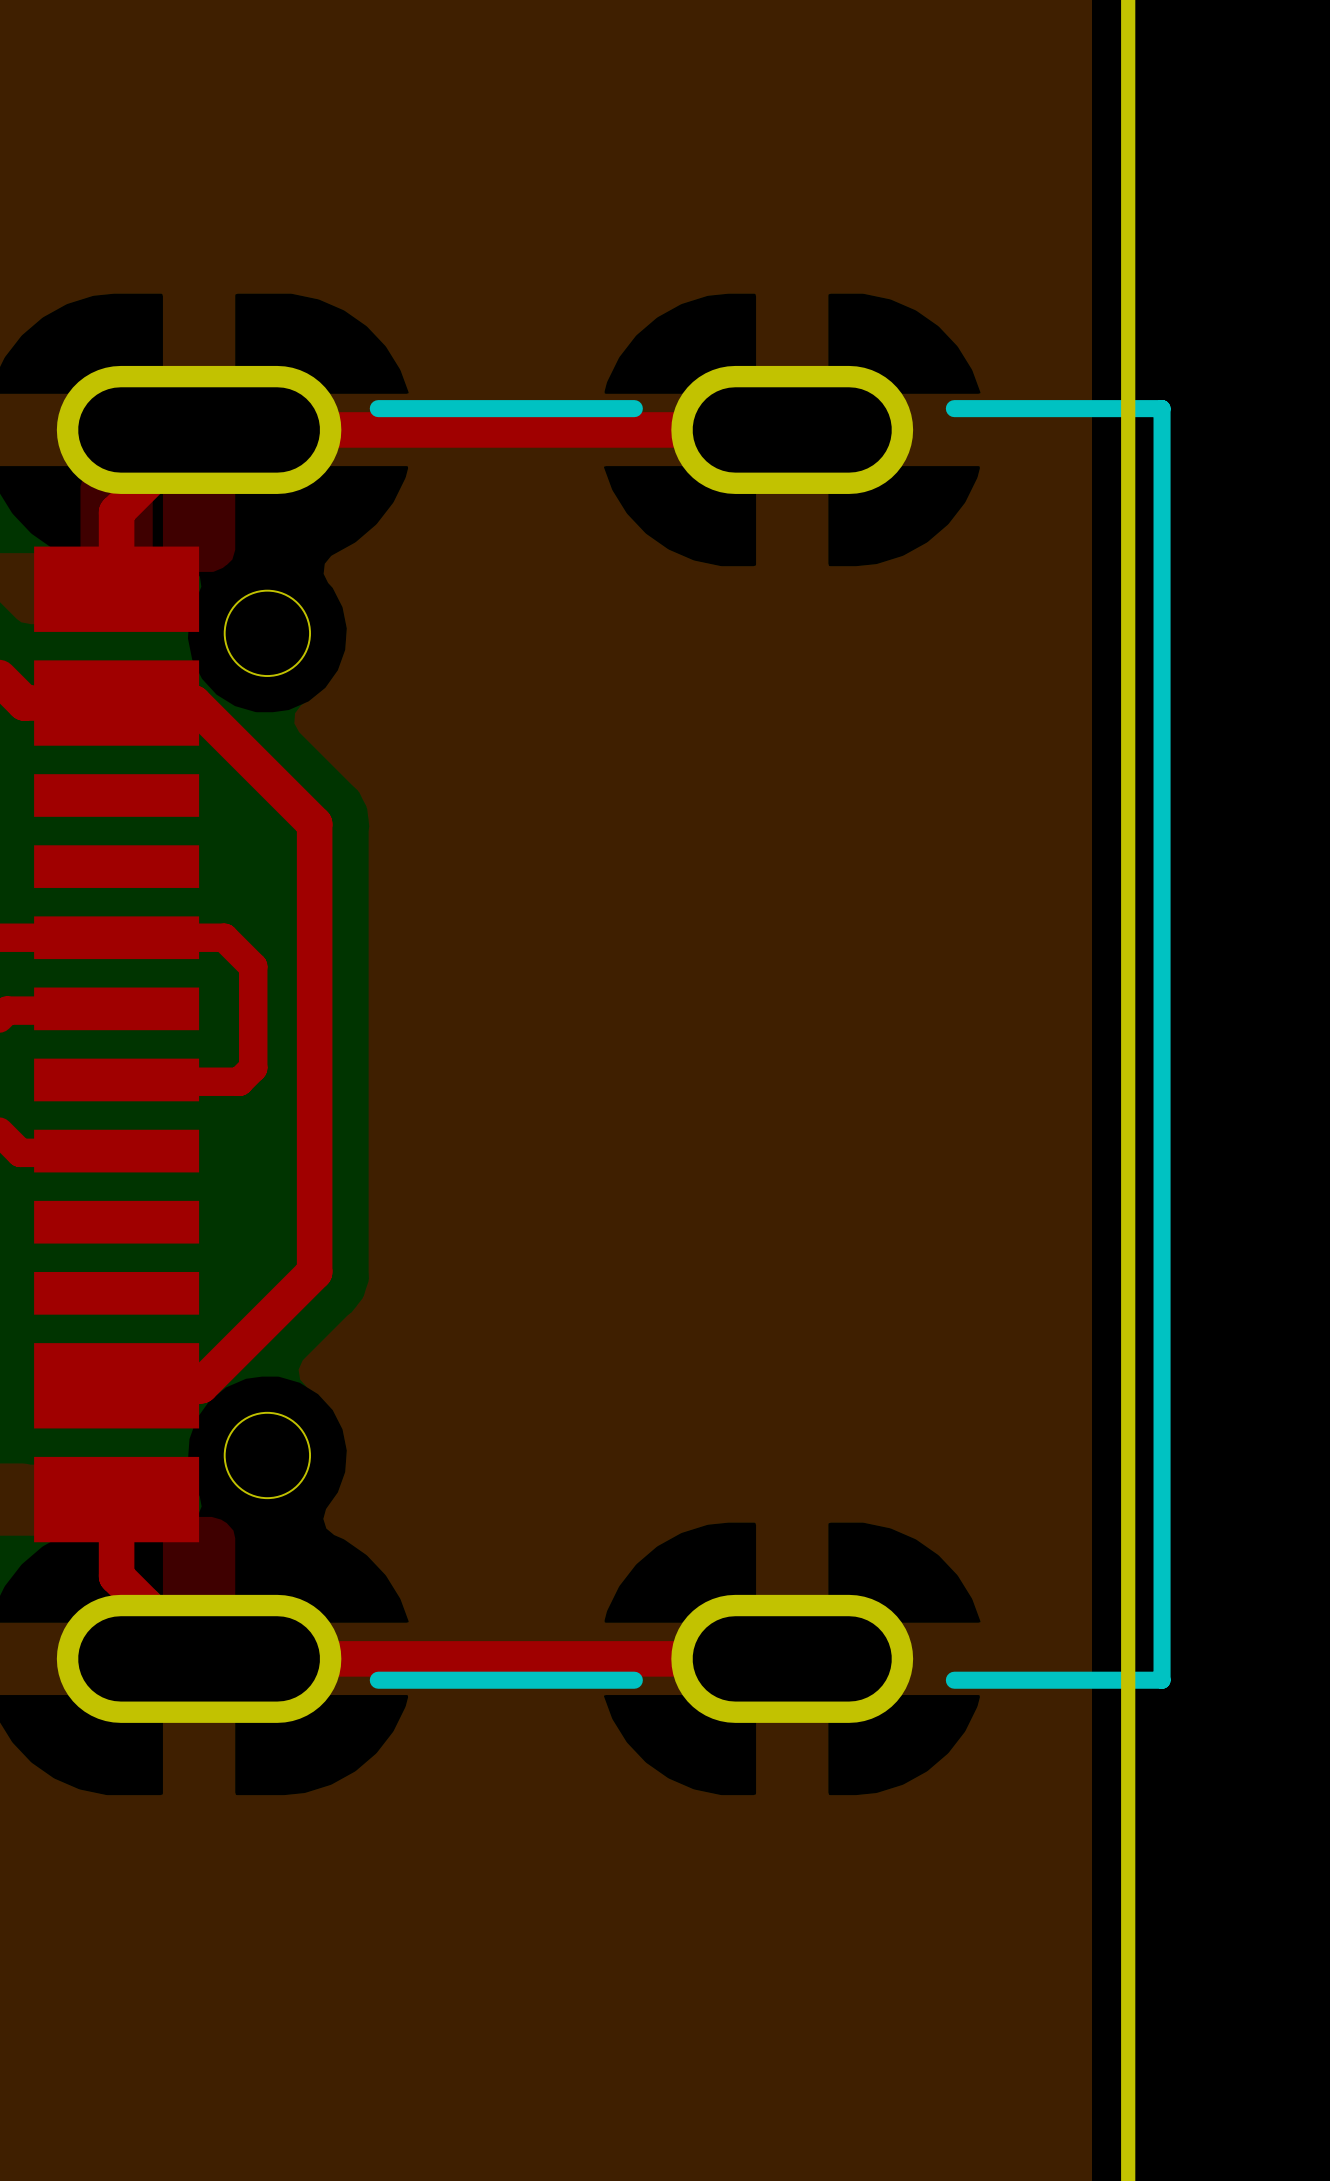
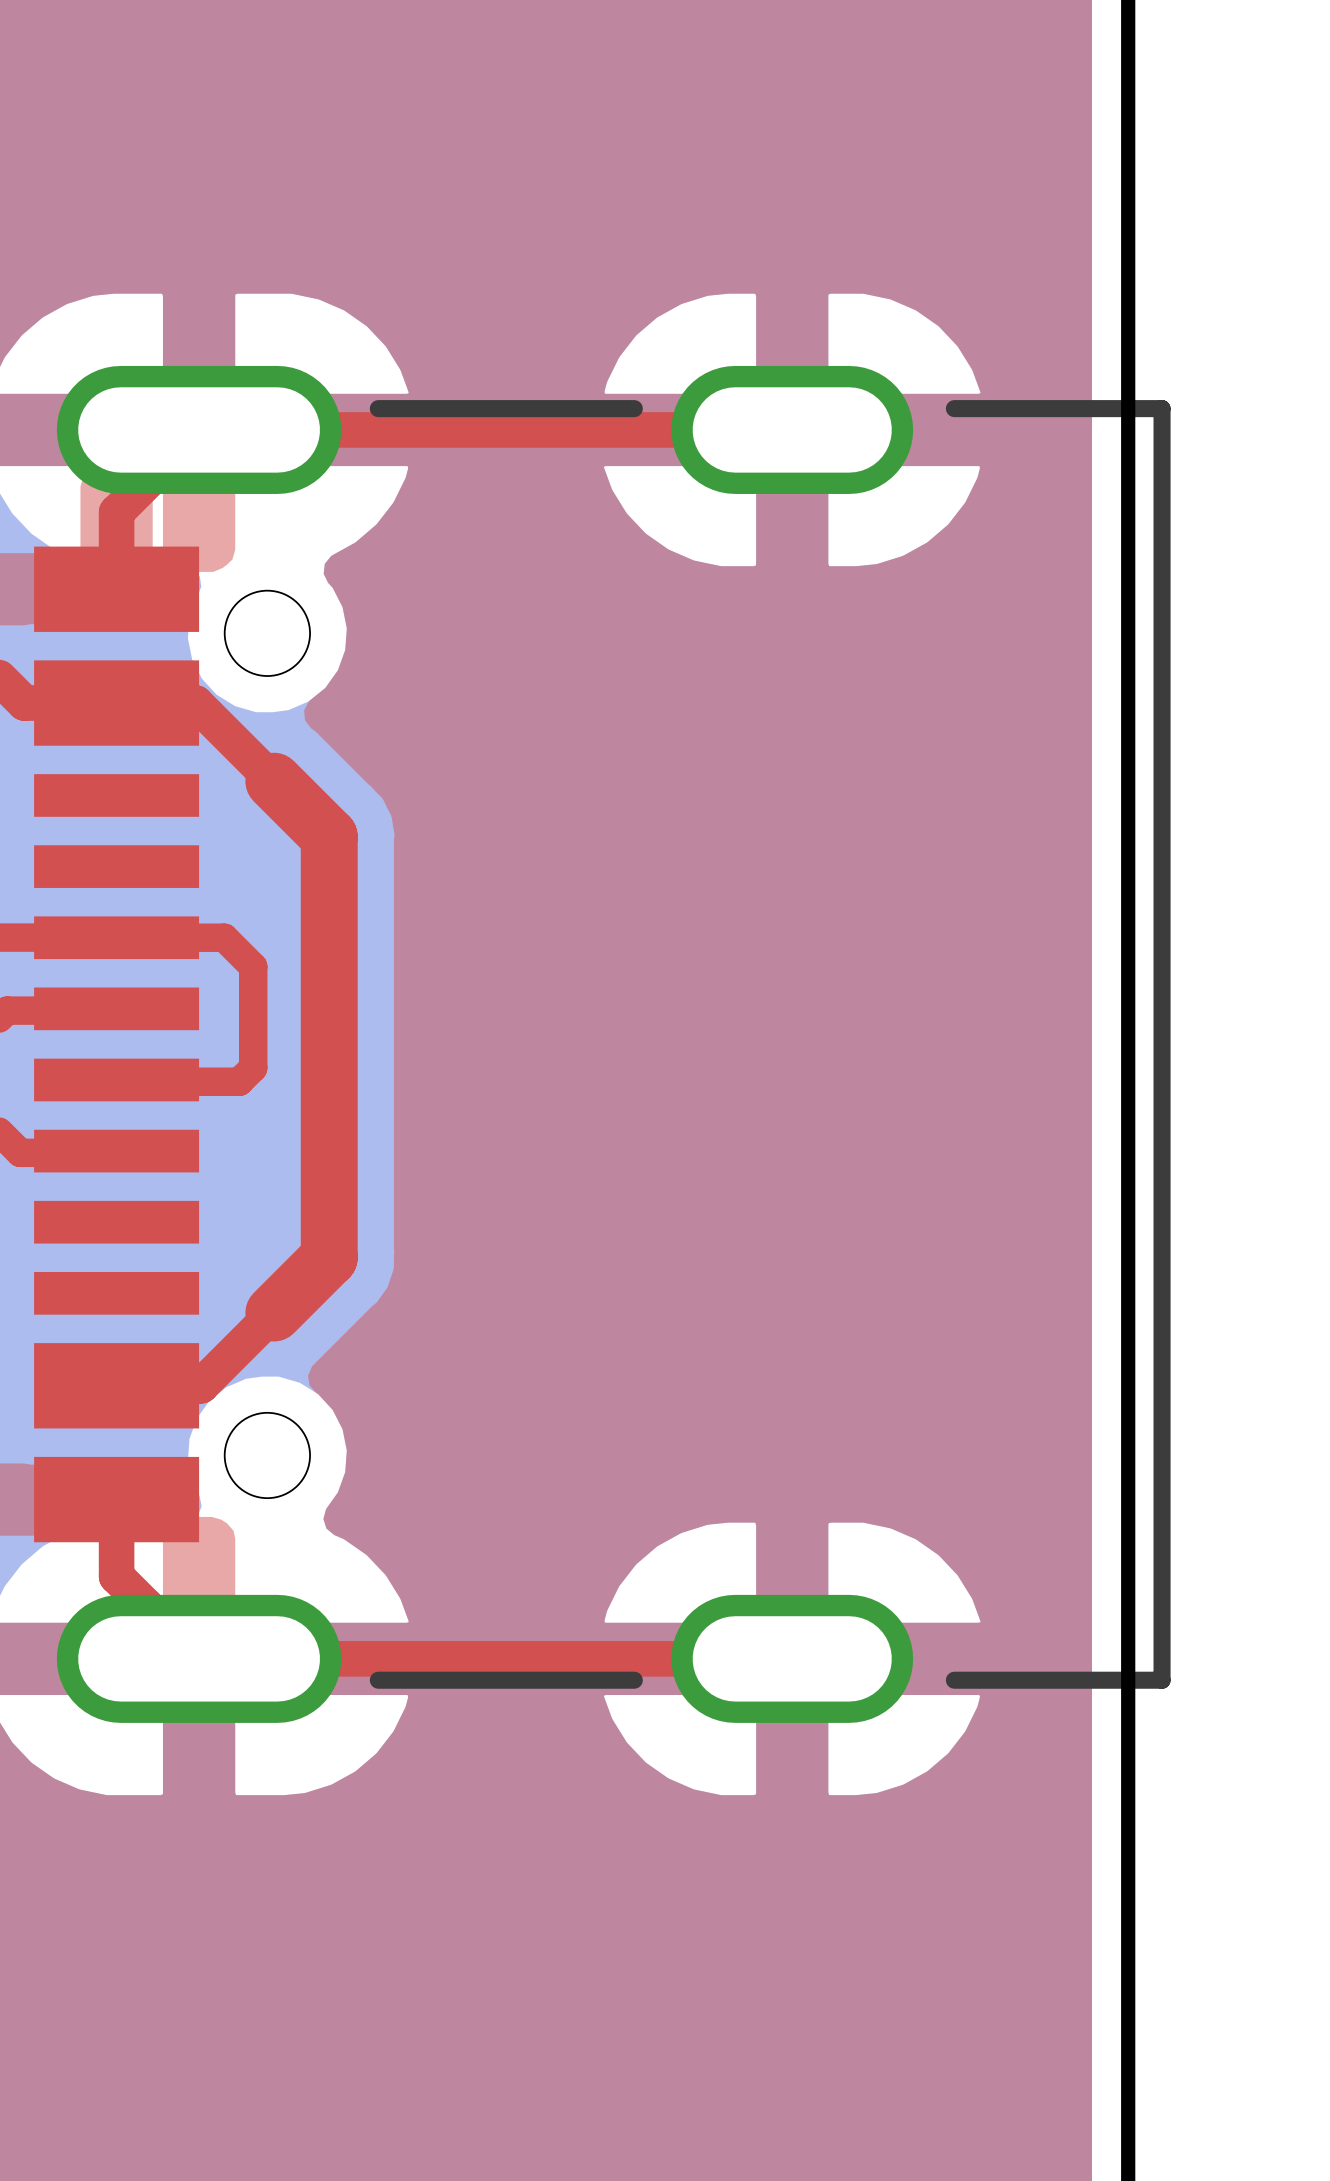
top track: (193, 703) (314, 824) (314, 1272) (273, 1313) -> (195, 703) (329, 836) (329, 1257) (273, 1313)

